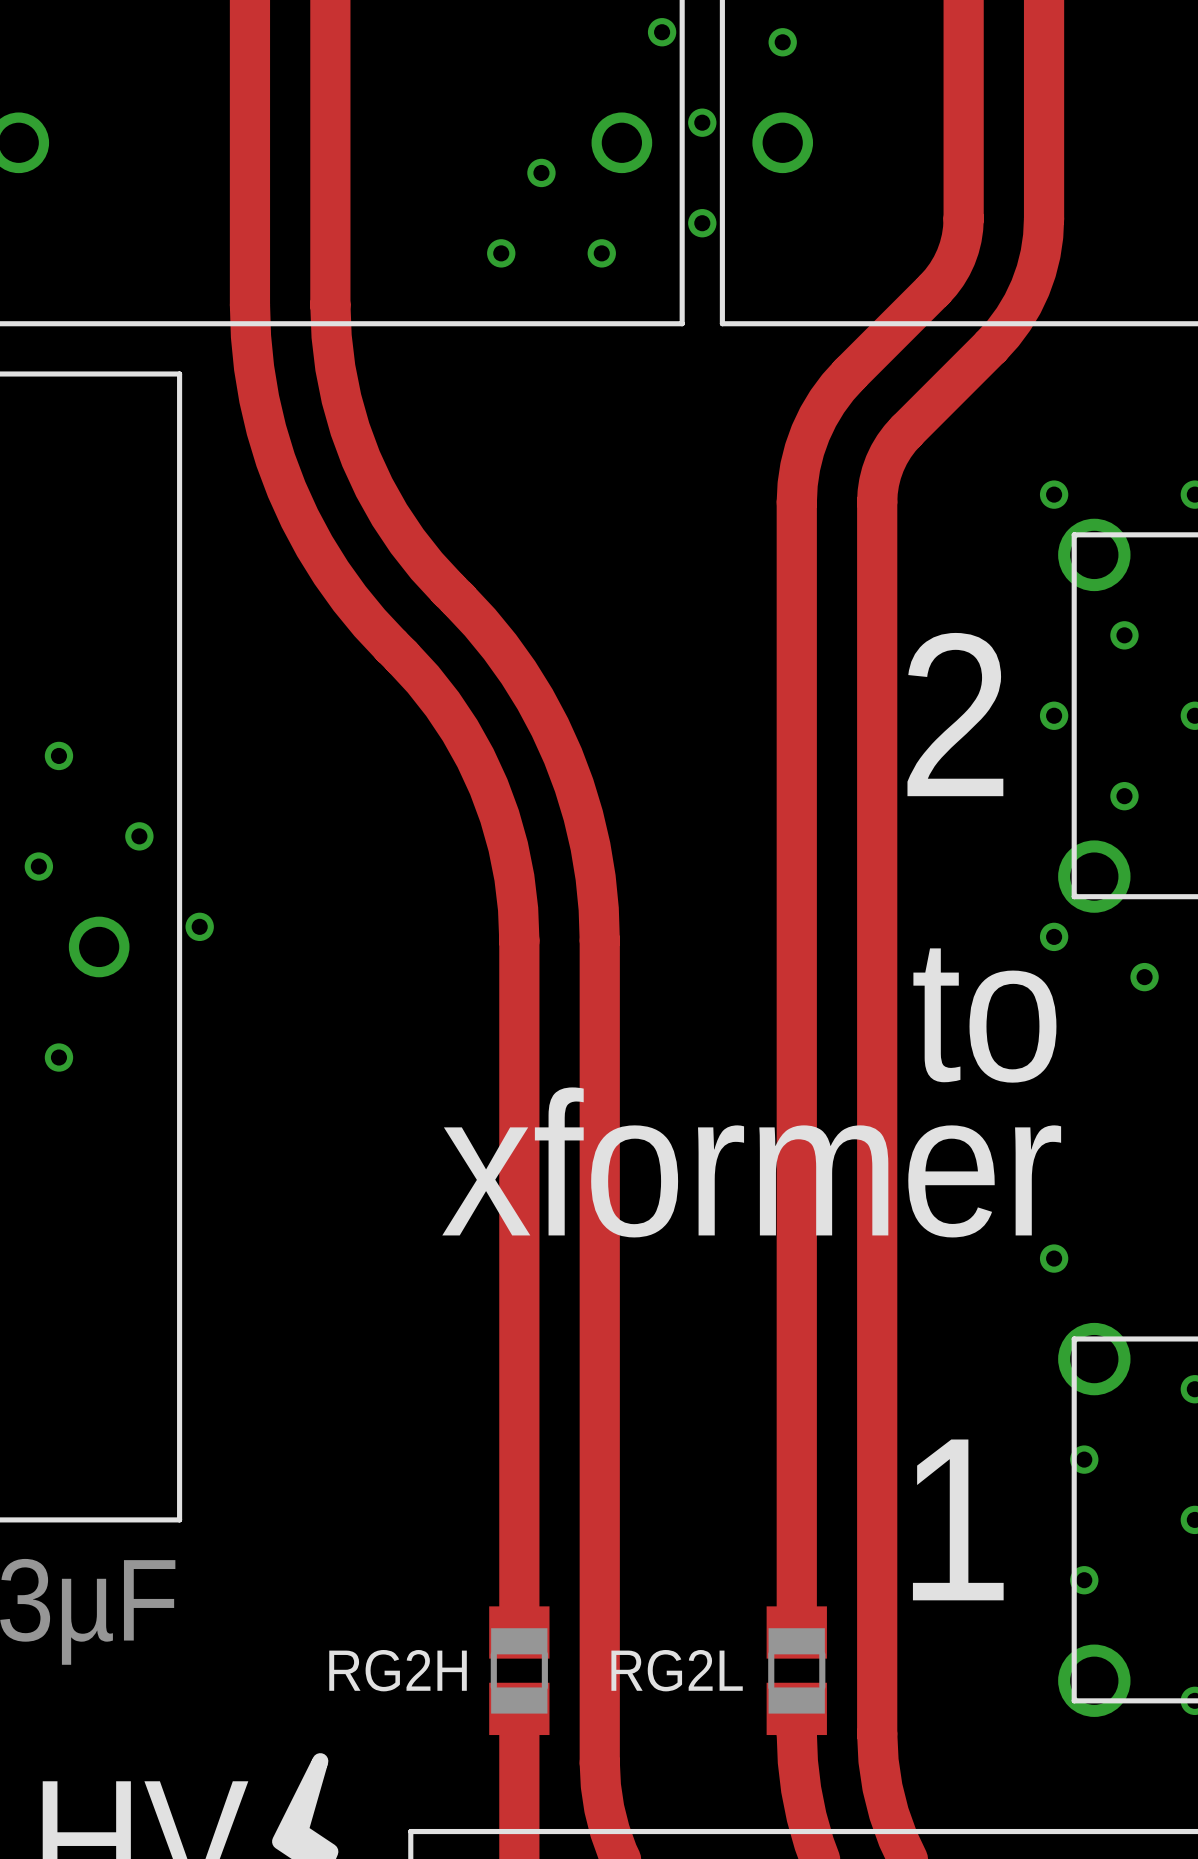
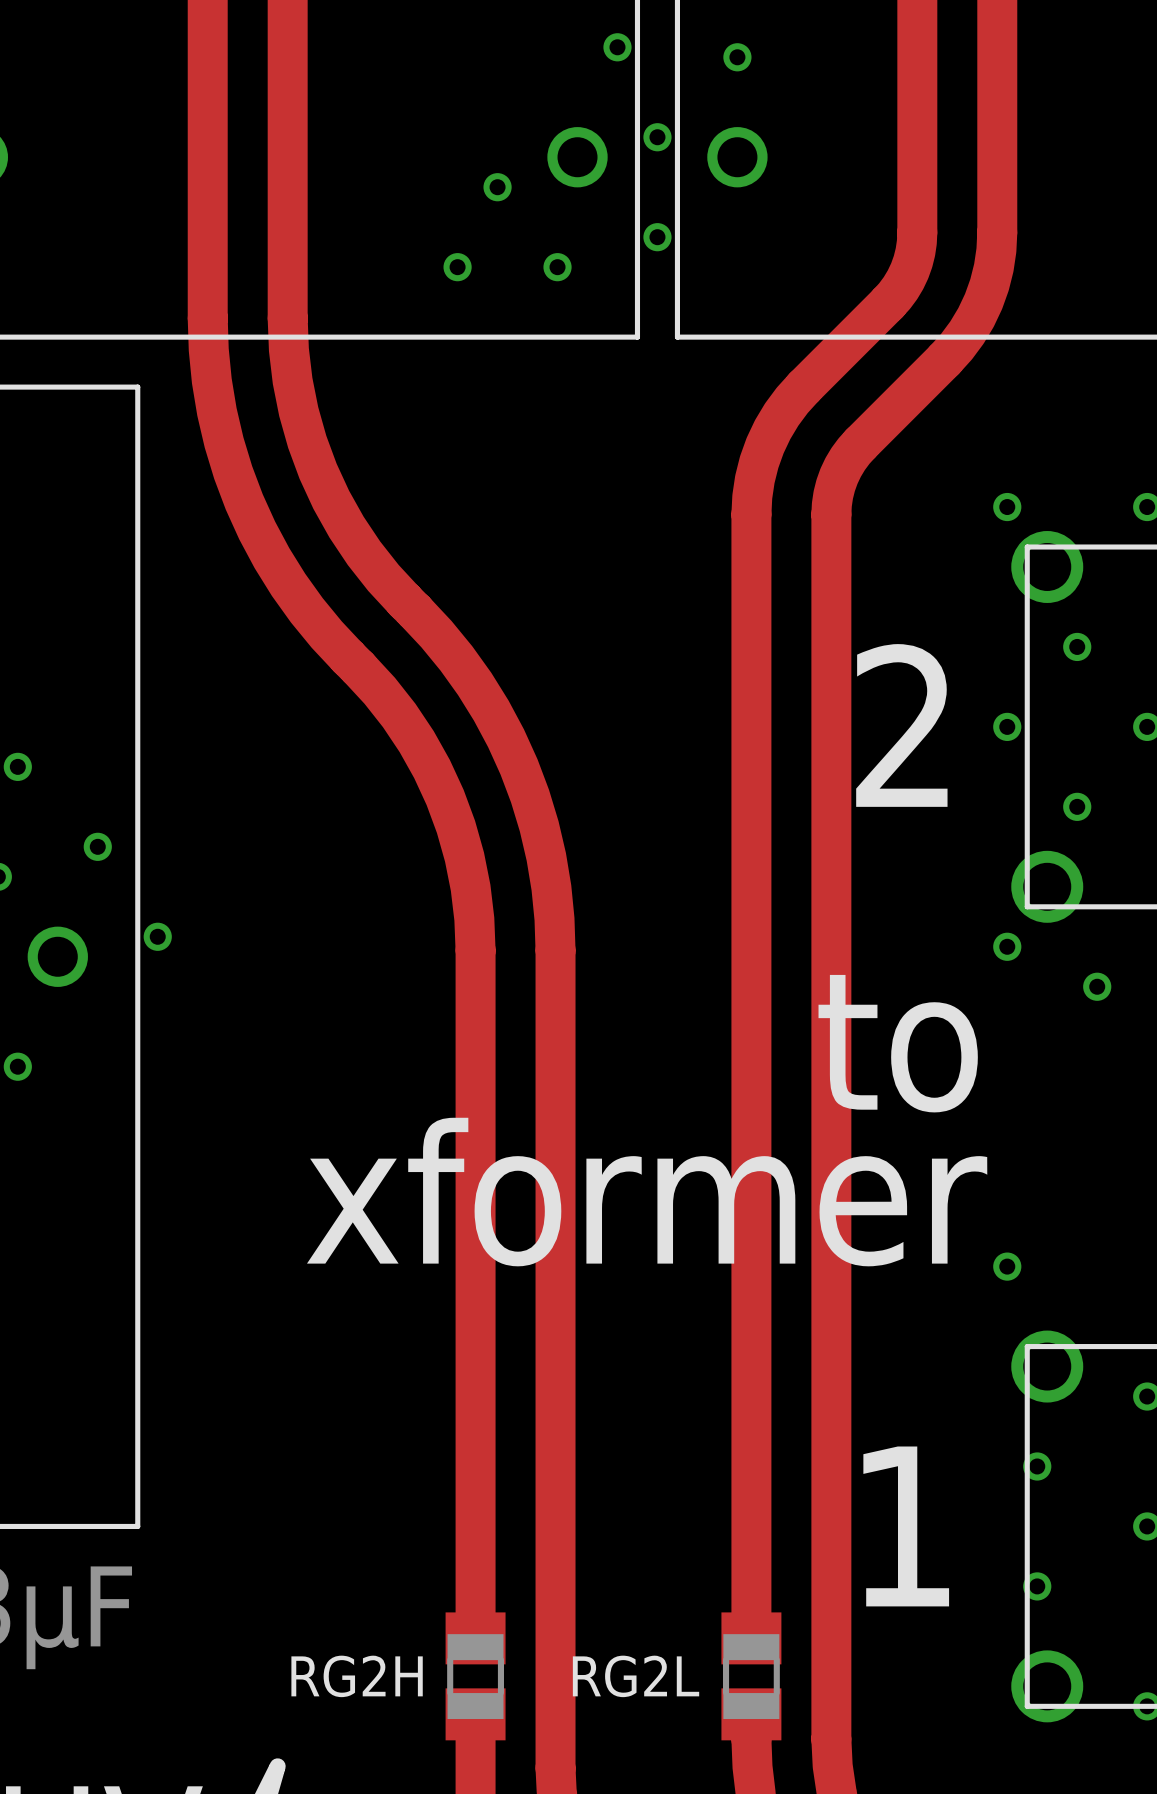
text position: to (984, 1015) -> to (898, 1043)
text position: xformer (751, 1162) -> xformer (647, 1192)

